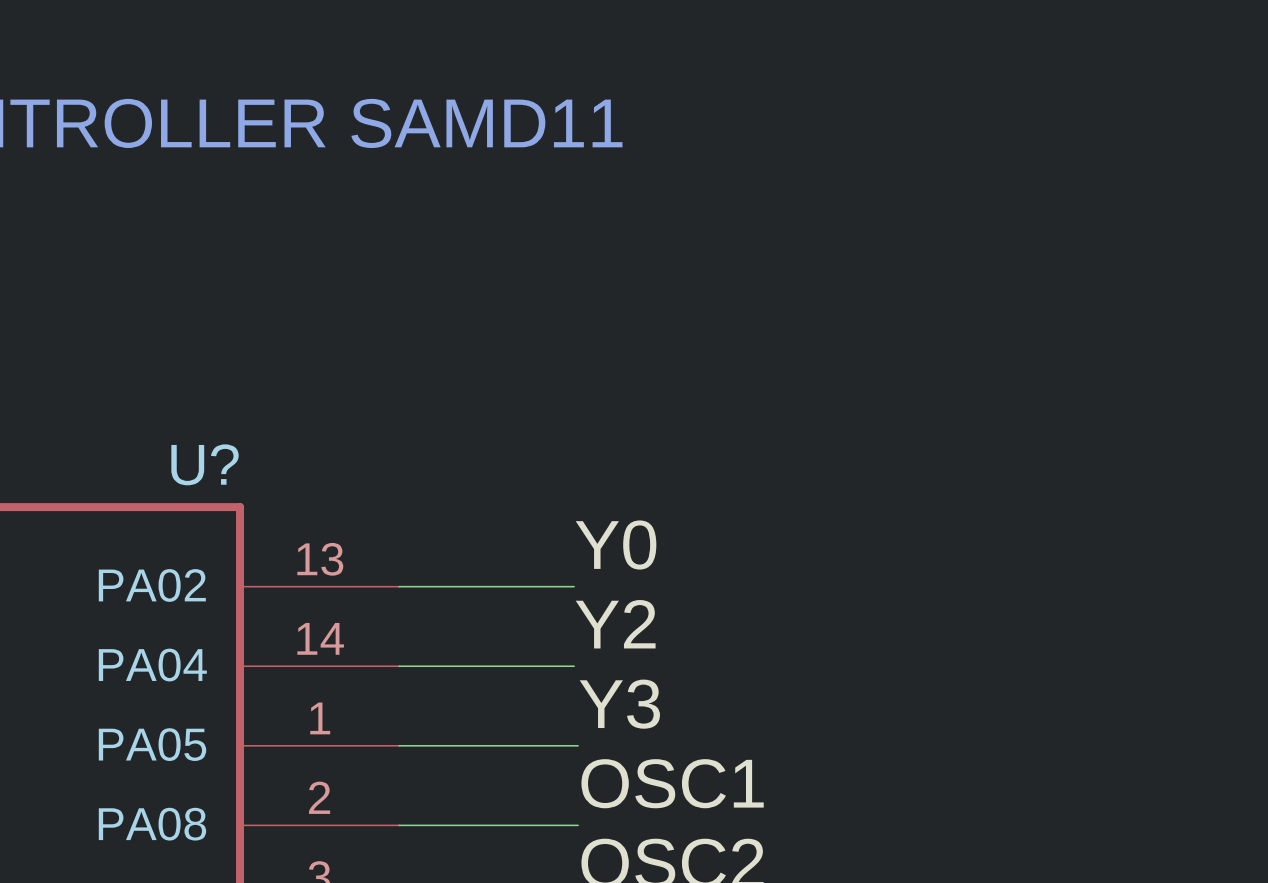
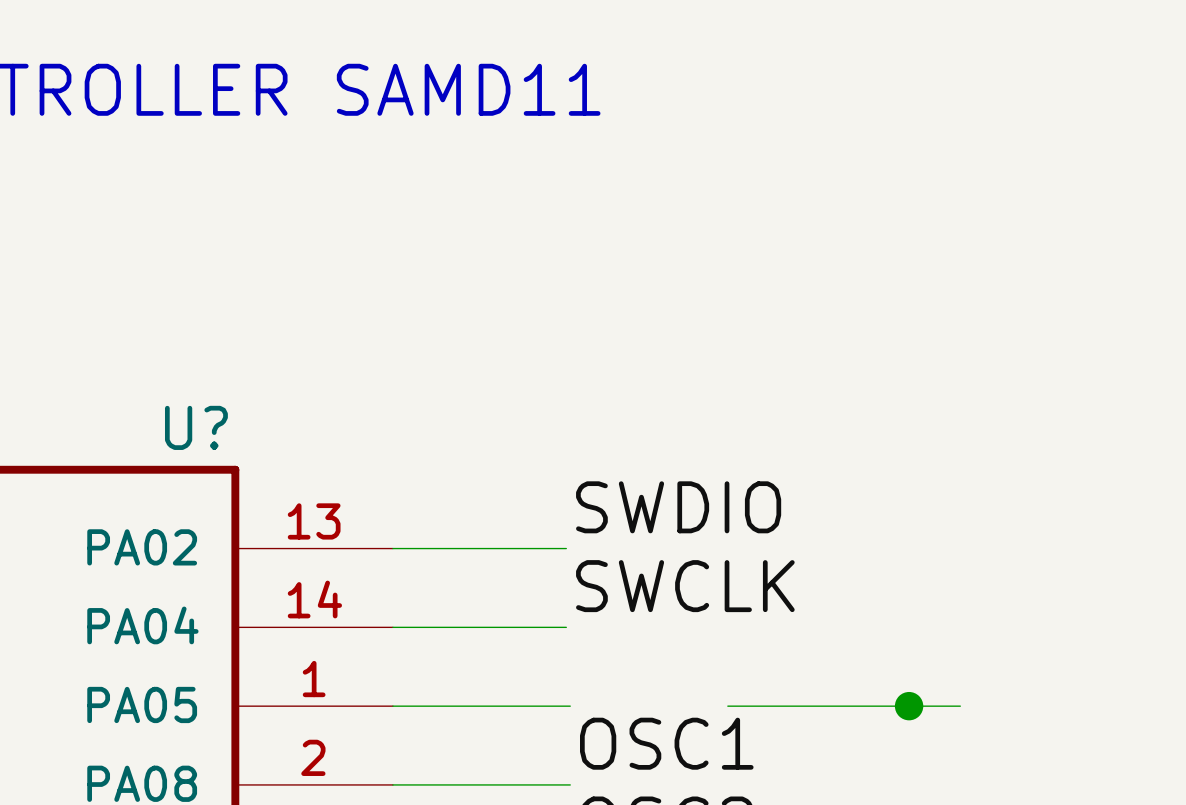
label: Y0 (616, 545) -> SWDIO (678, 507)
label: Y2 (615, 624) -> SWCLK (685, 586)
label: Y3 (619, 704) -> none
wire: none -> (727, 706) (960, 706)
junction: none -> (909, 706)

